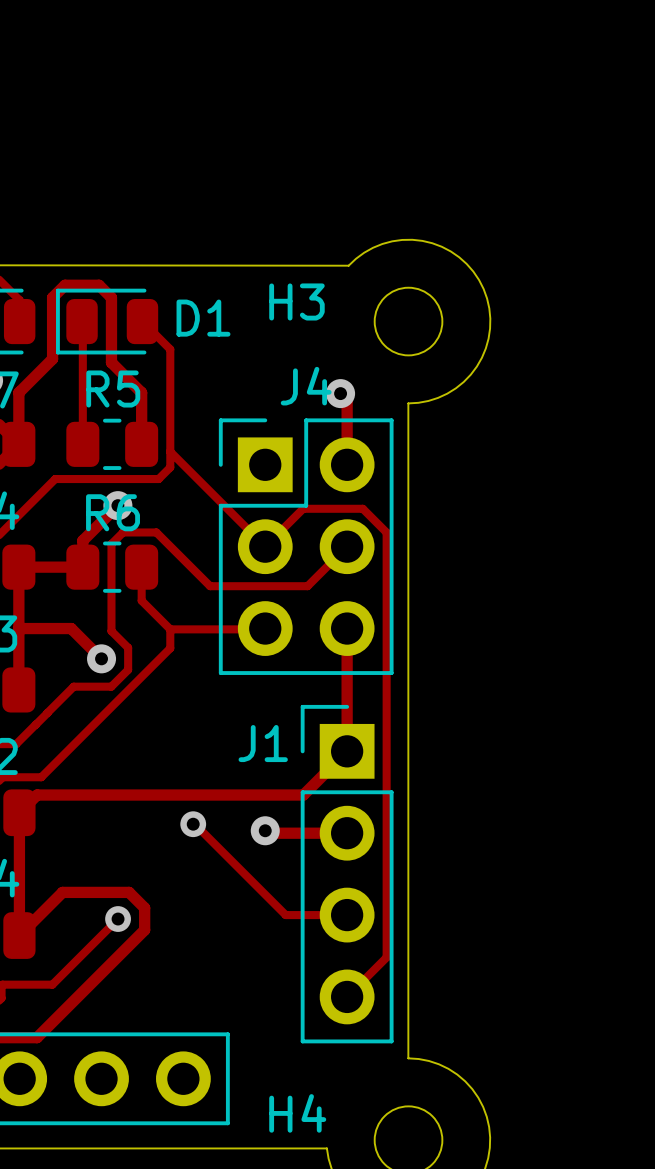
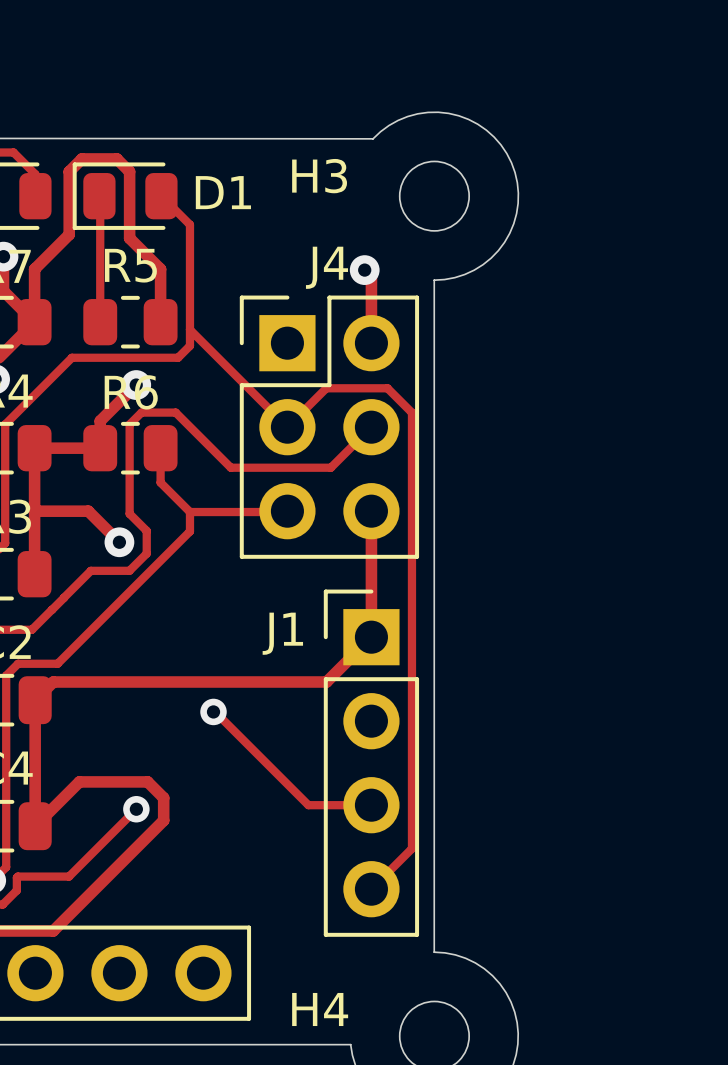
track: (265, 830) (267, 833) (347, 833) -> none
via: (265, 830) -> none

